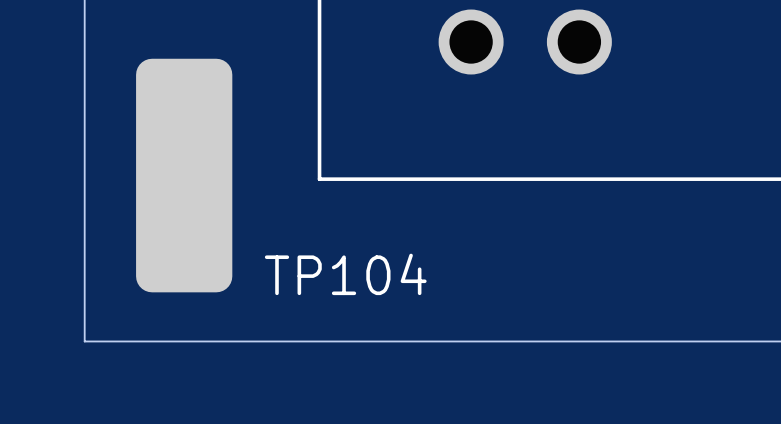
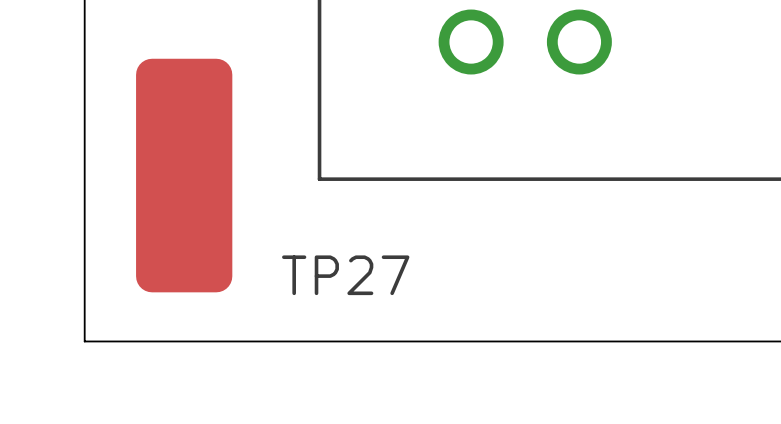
TP104 name: TP104 (345, 274) -> TP27 (345, 275)

